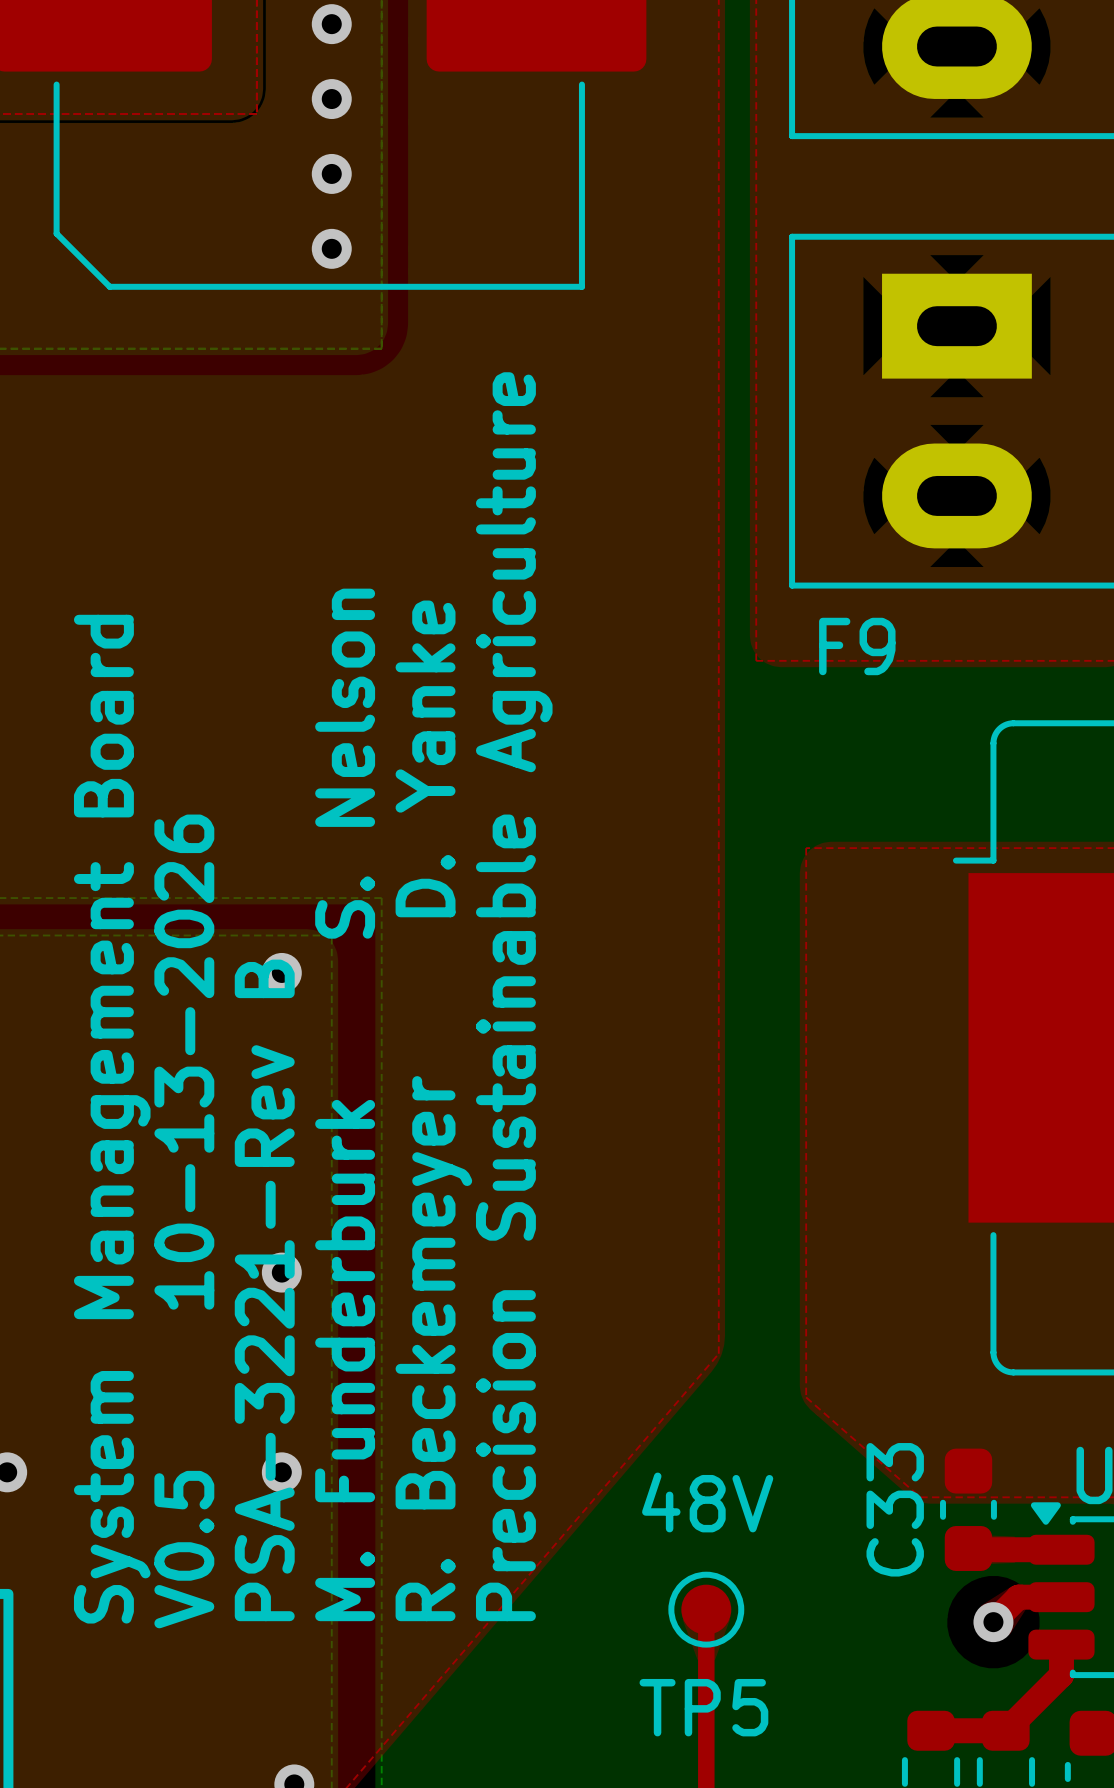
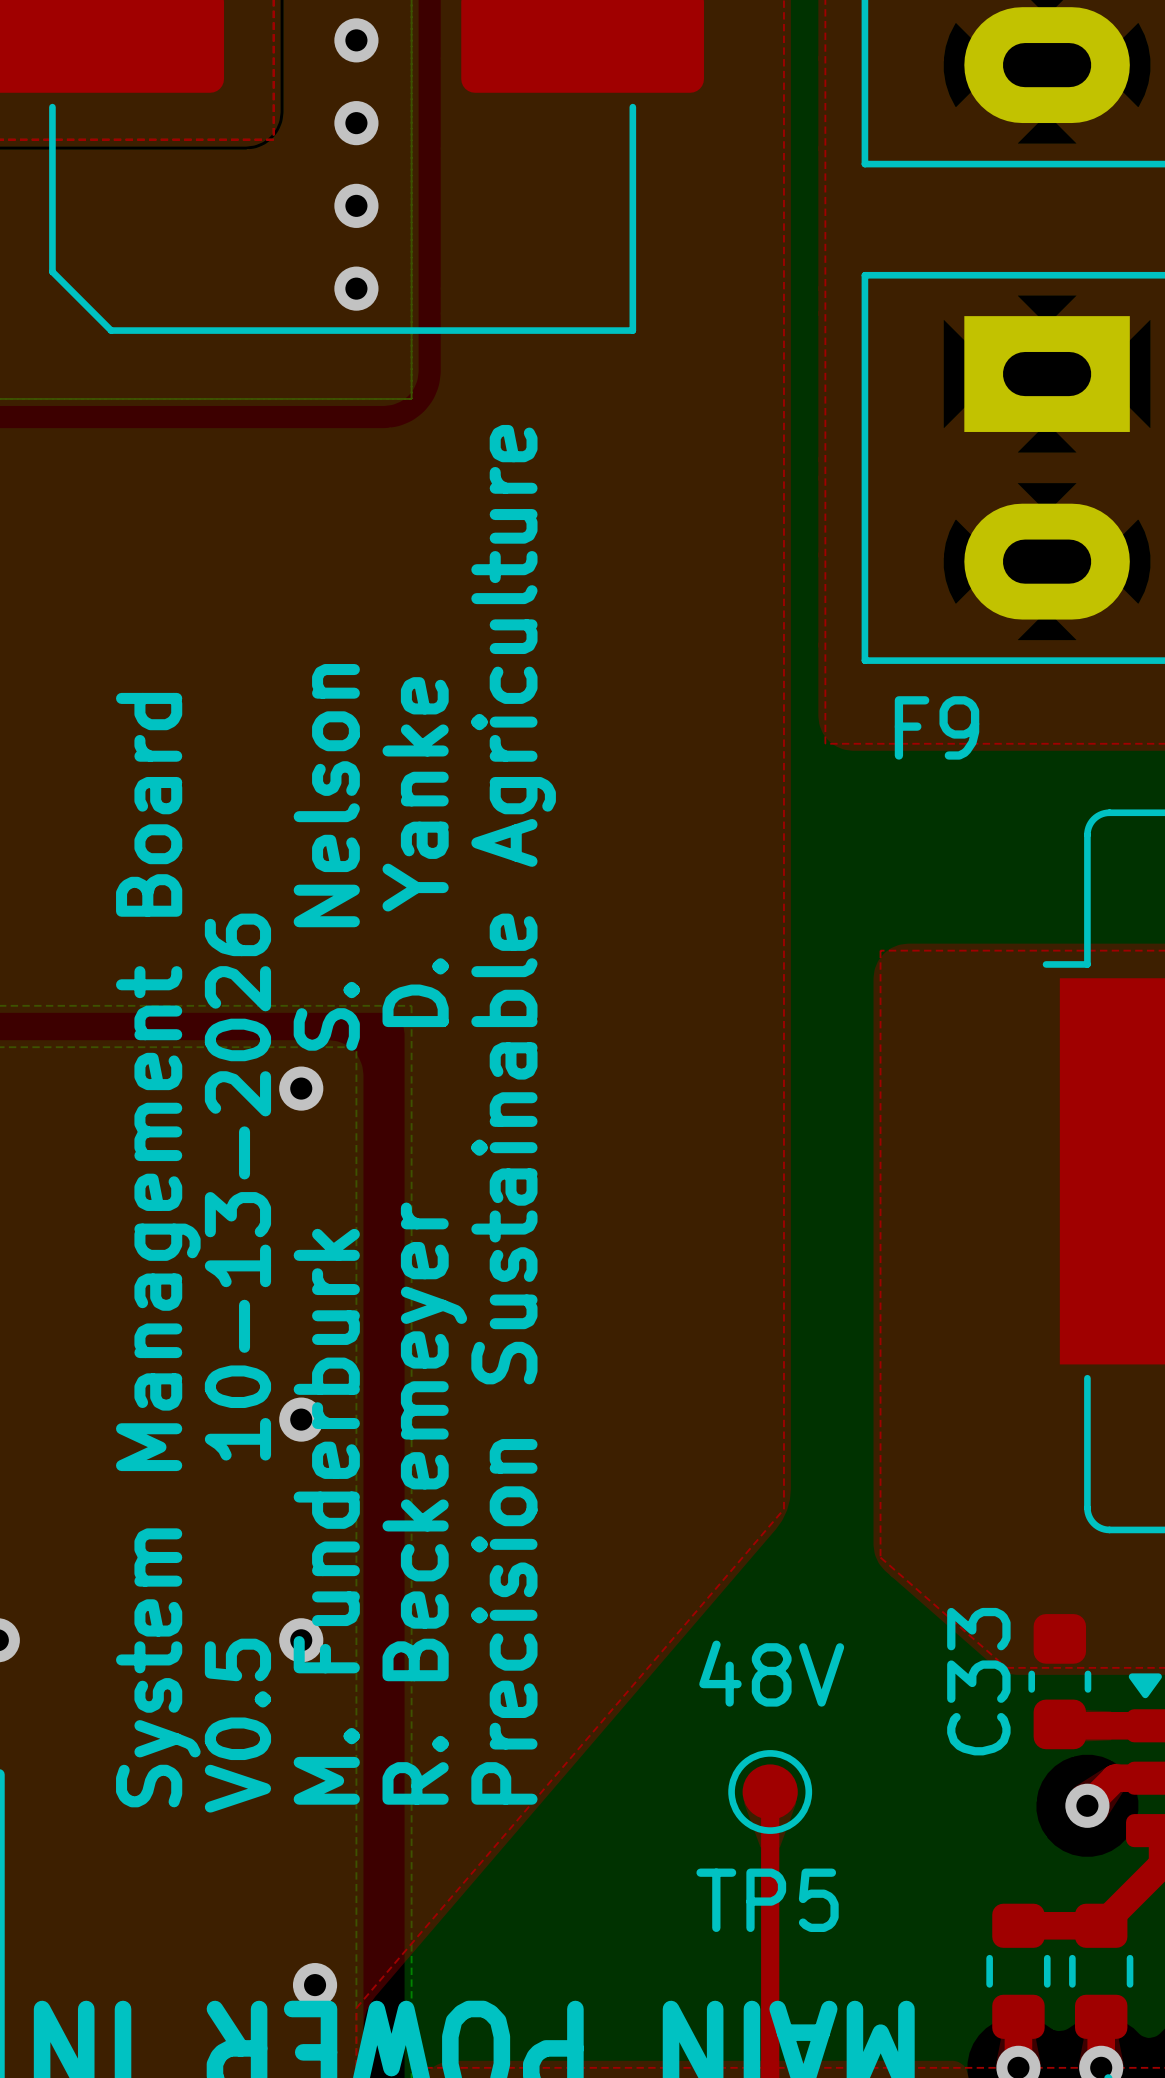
text position: Precision Sustainable Agriculture (514, 996) -> Precision Sustainable Agriculture (513, 1114)
text position: M. Funderburk S. Nelson (345, 1104) -> M. Funderburk S. Nelson (326, 1234)
text position: R. Beckemeyer D. Yanke (433, 1110) -> R. Beckemeyer D. Yanke (424, 1240)
text position: System Management Board (112, 1119) -> System Management Board (158, 1250)
text position: V0.5 10-13-2026 (184, 1221) -> V0.5 10-13-2026 (237, 1363)
text: PSA-3221-Rev B (264, 1290) -> none

